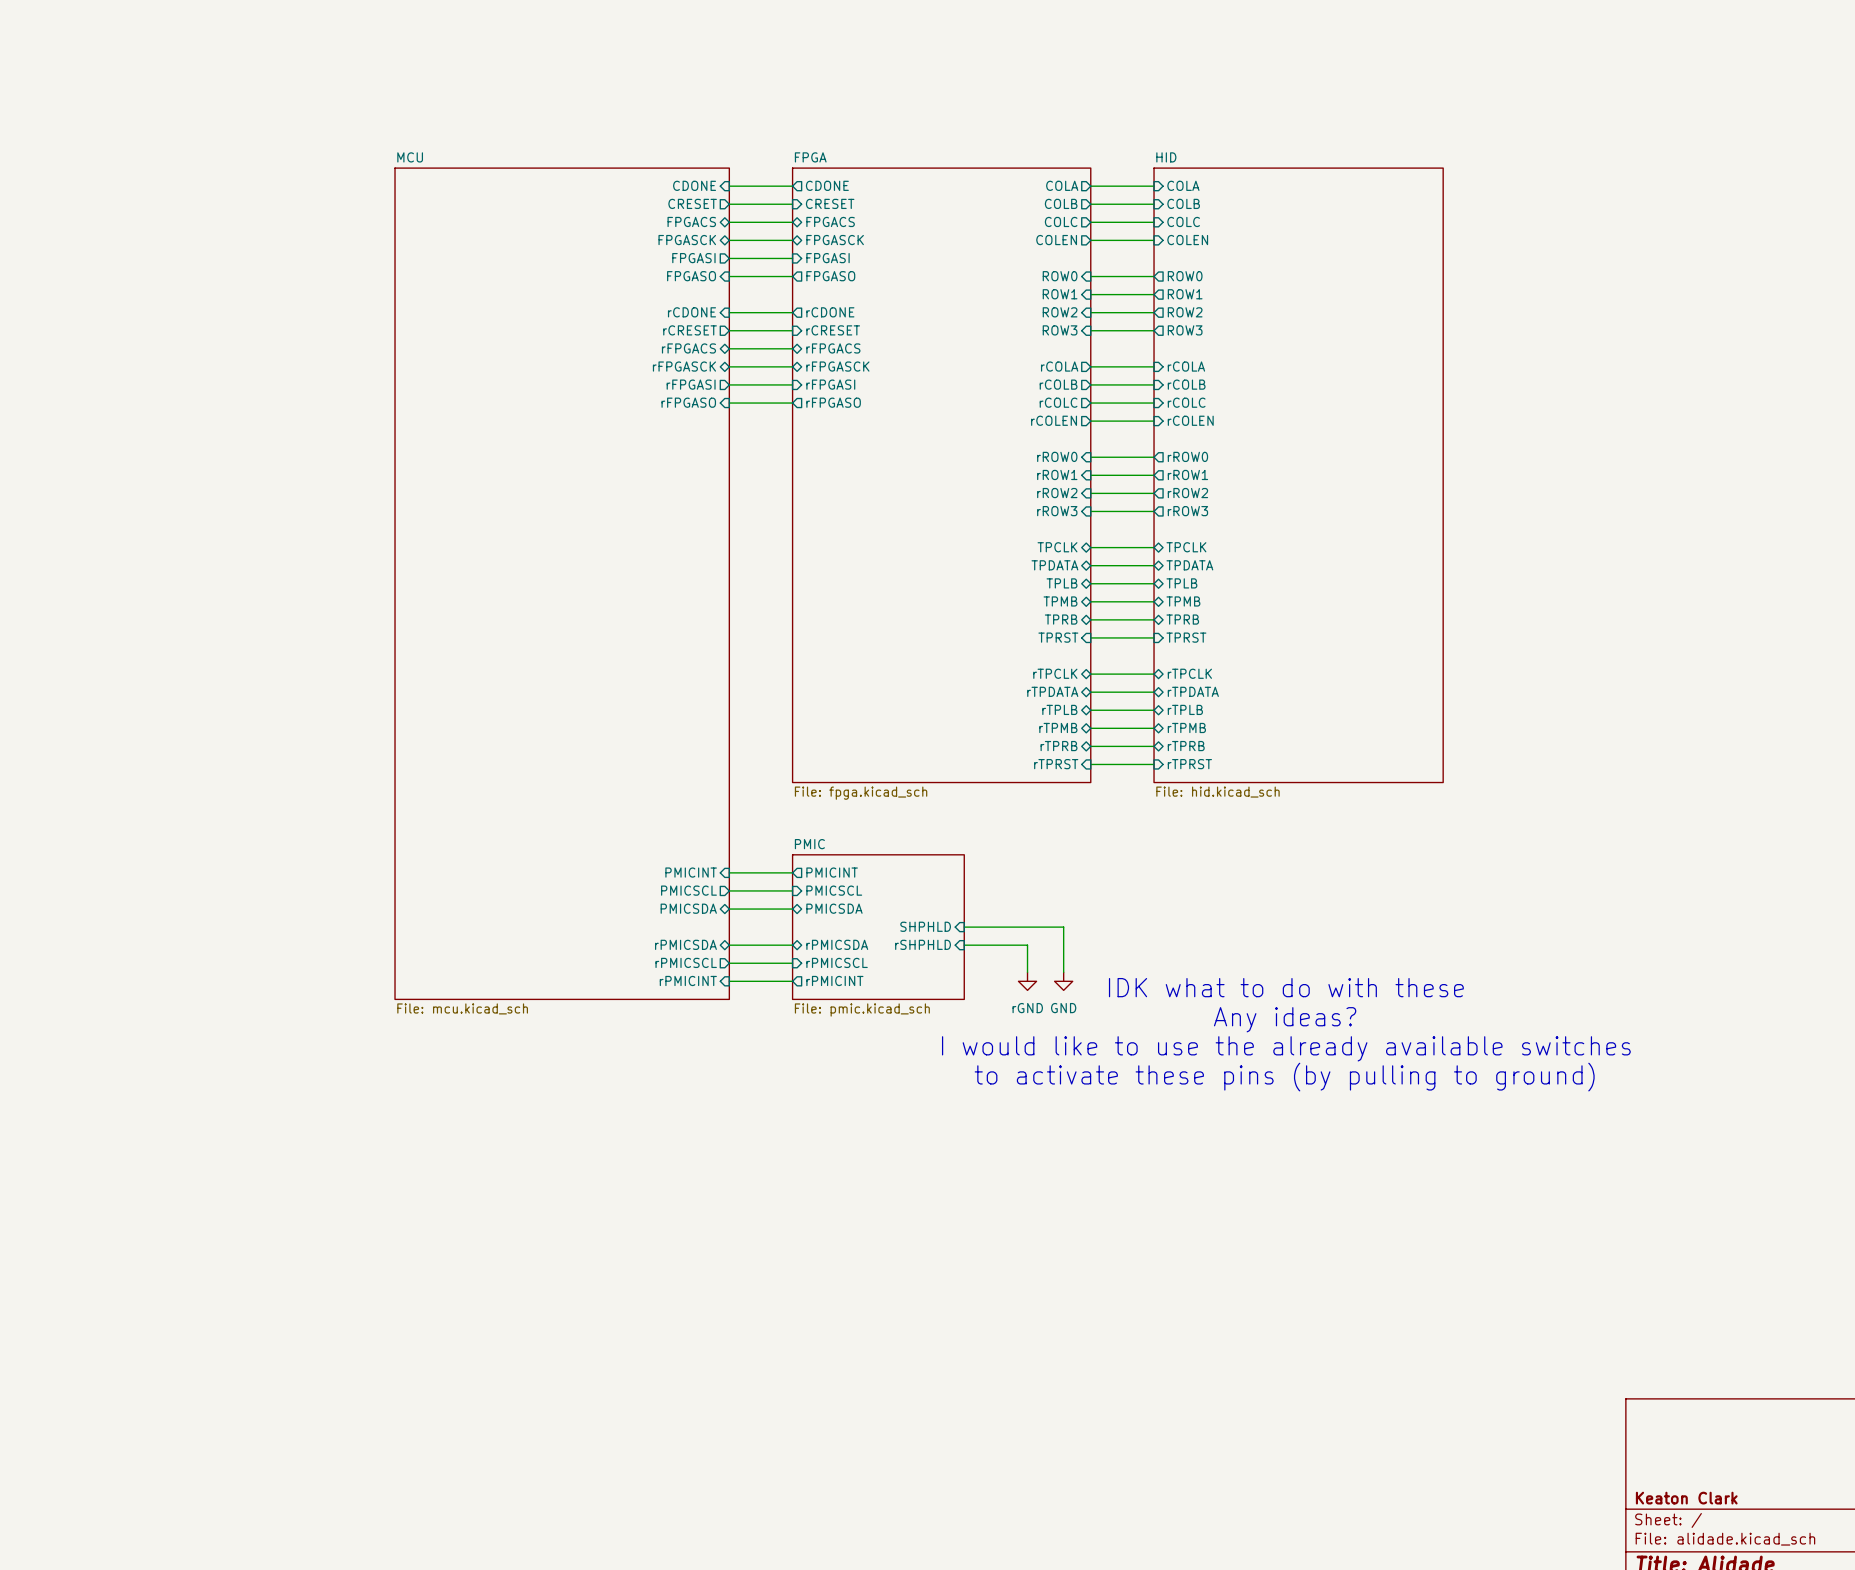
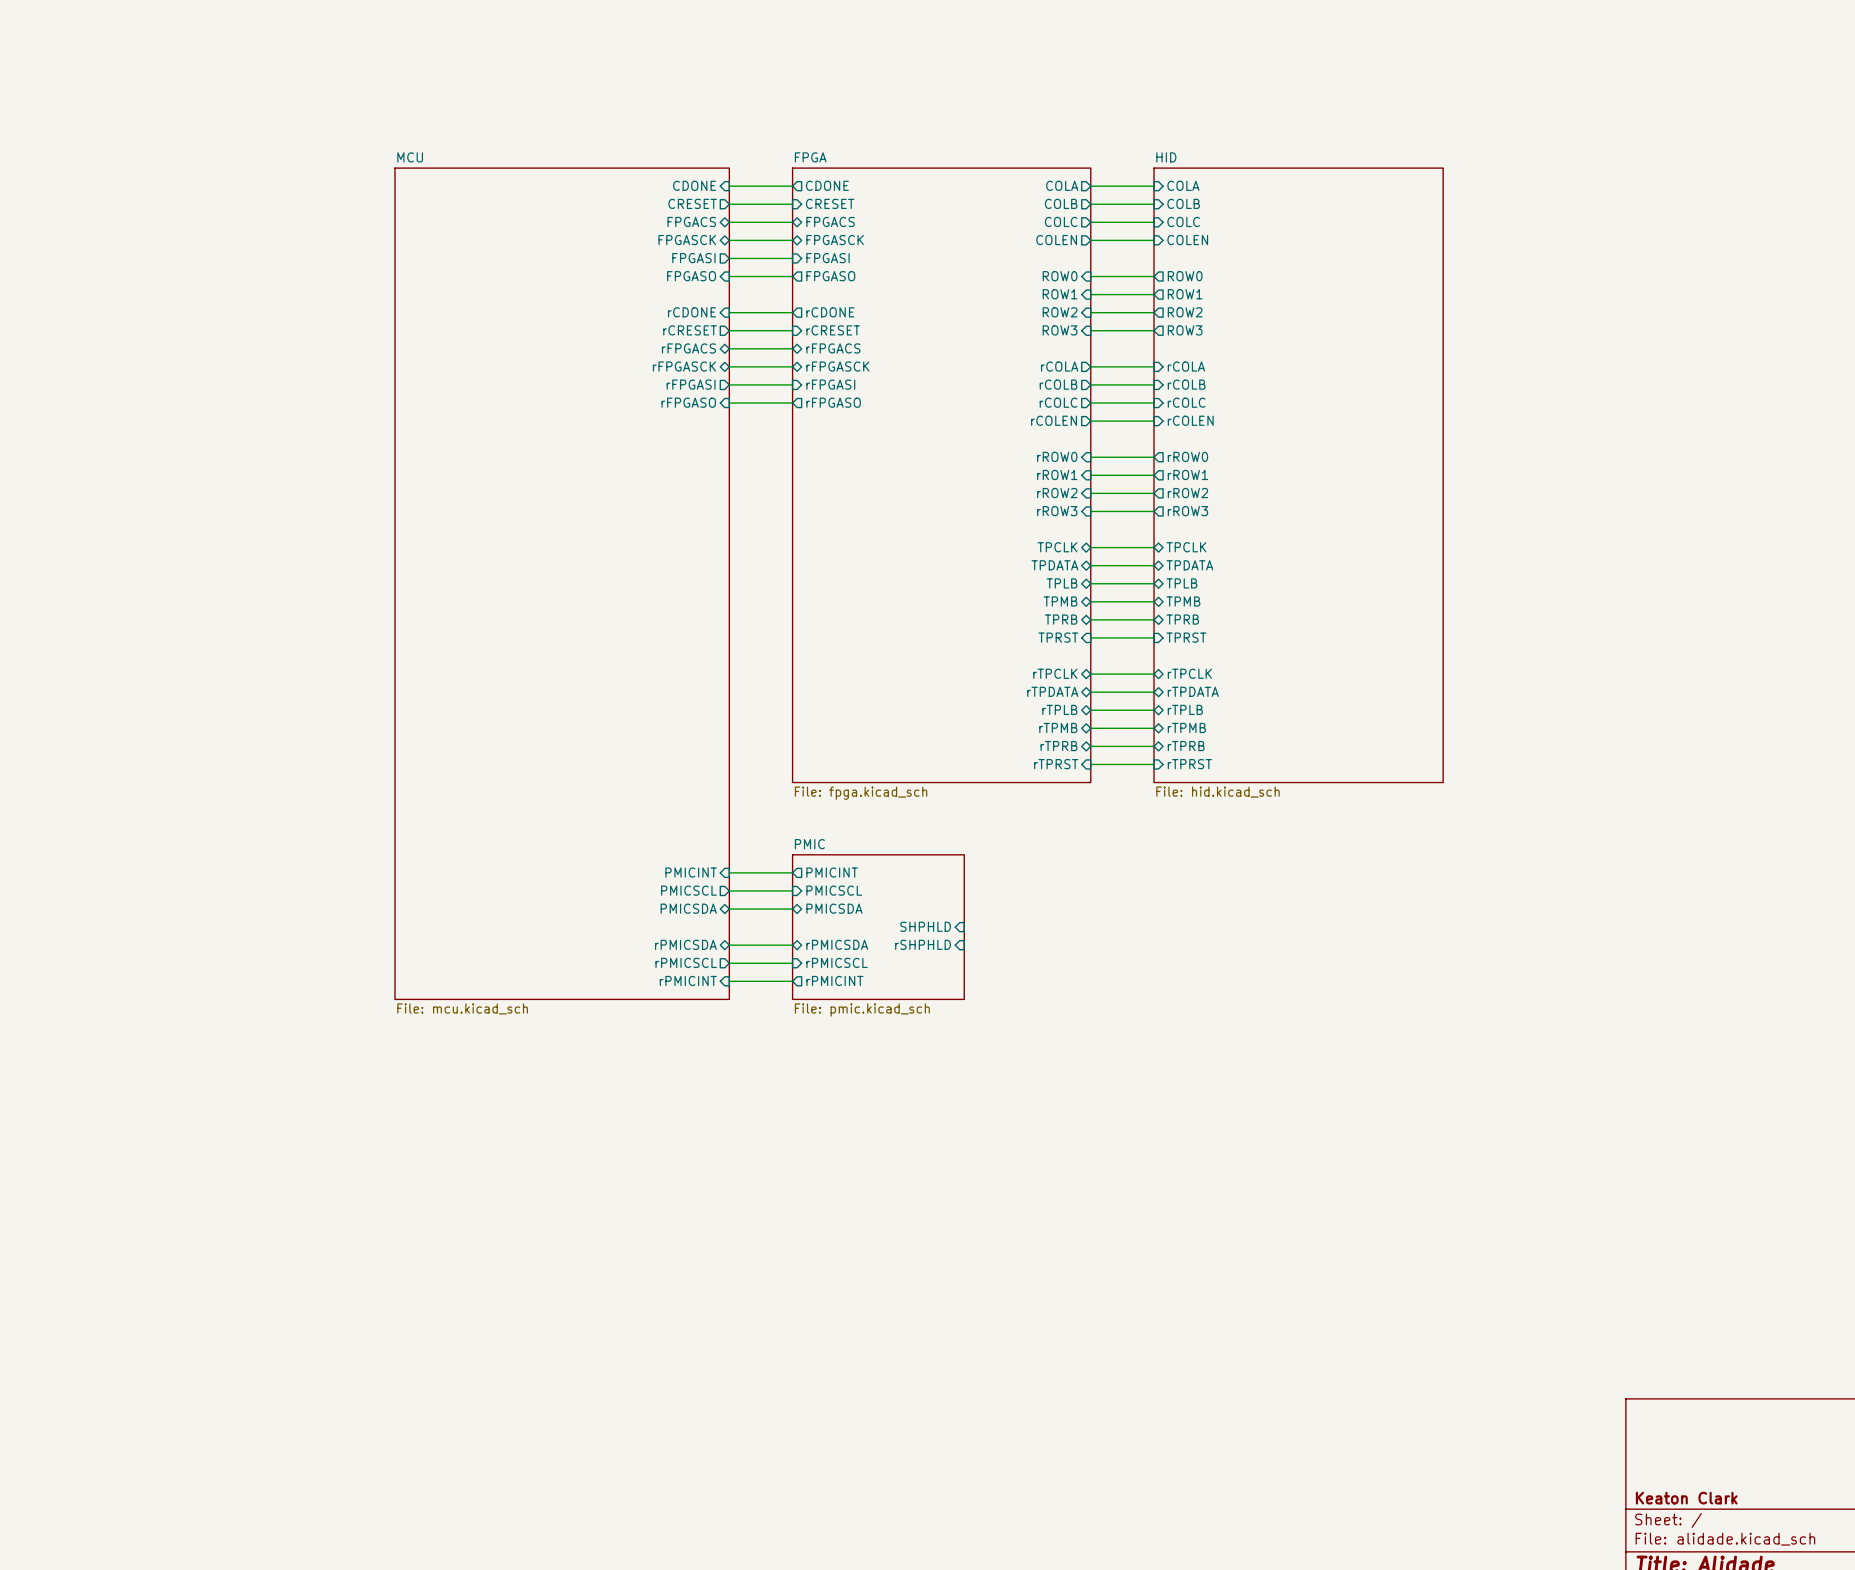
wire: (964, 927) (1063, 927) (1063, 972) -> none
wire: (964, 945) (1027, 945) (1027, 972) -> none
power symbol: rGND (1027, 981) -> none
power symbol: GND (1063, 981) -> none
text: IDK what to do with these (1286, 987) -> none
text: Any ideas? (1285, 1019) -> none
text: I would like to use the already available switches (1286, 1048) -> none
text: to activate these pins (by pulling to ground) (1284, 1077) -> none

